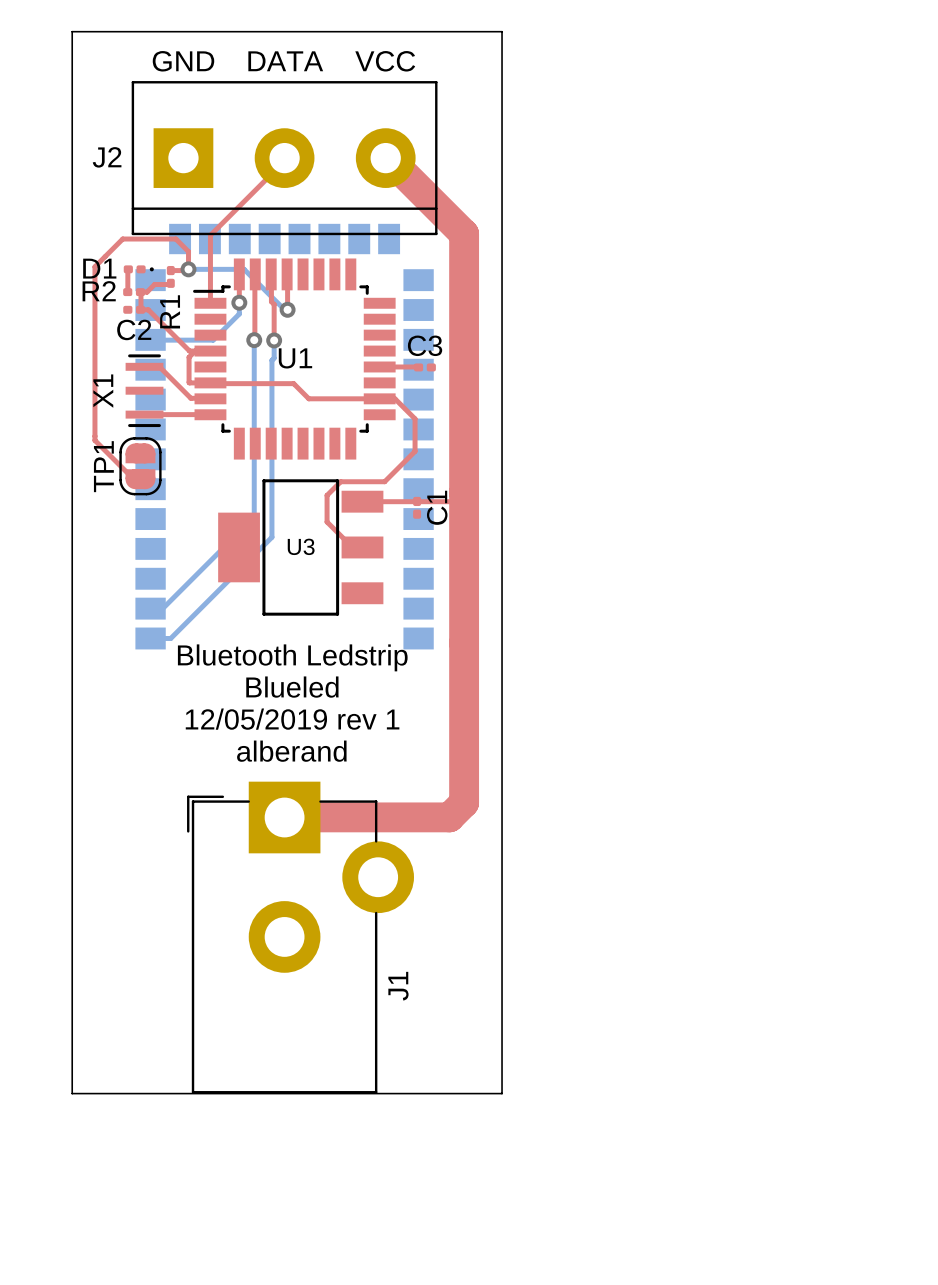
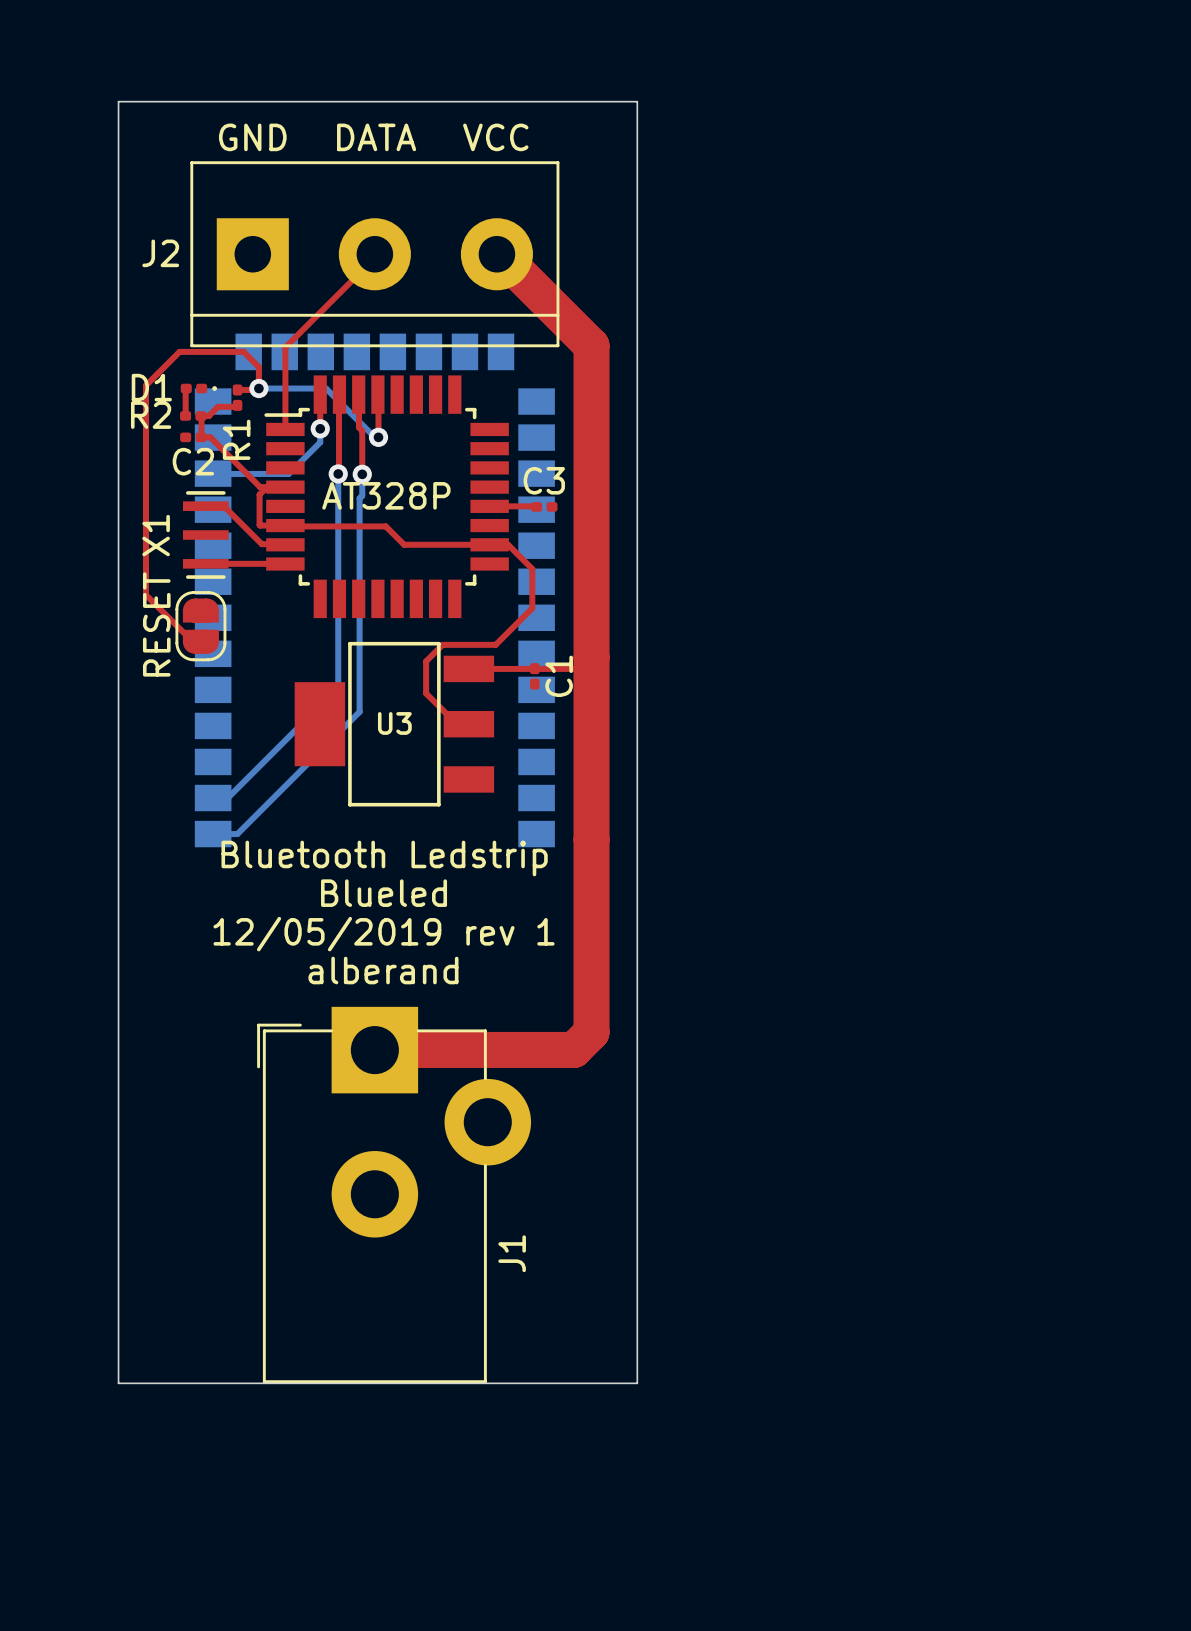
U1 name: U1 (295, 358) -> AT328P (386, 495)
TP1 name: TP1 (103, 466) -> RESET (156, 624)

